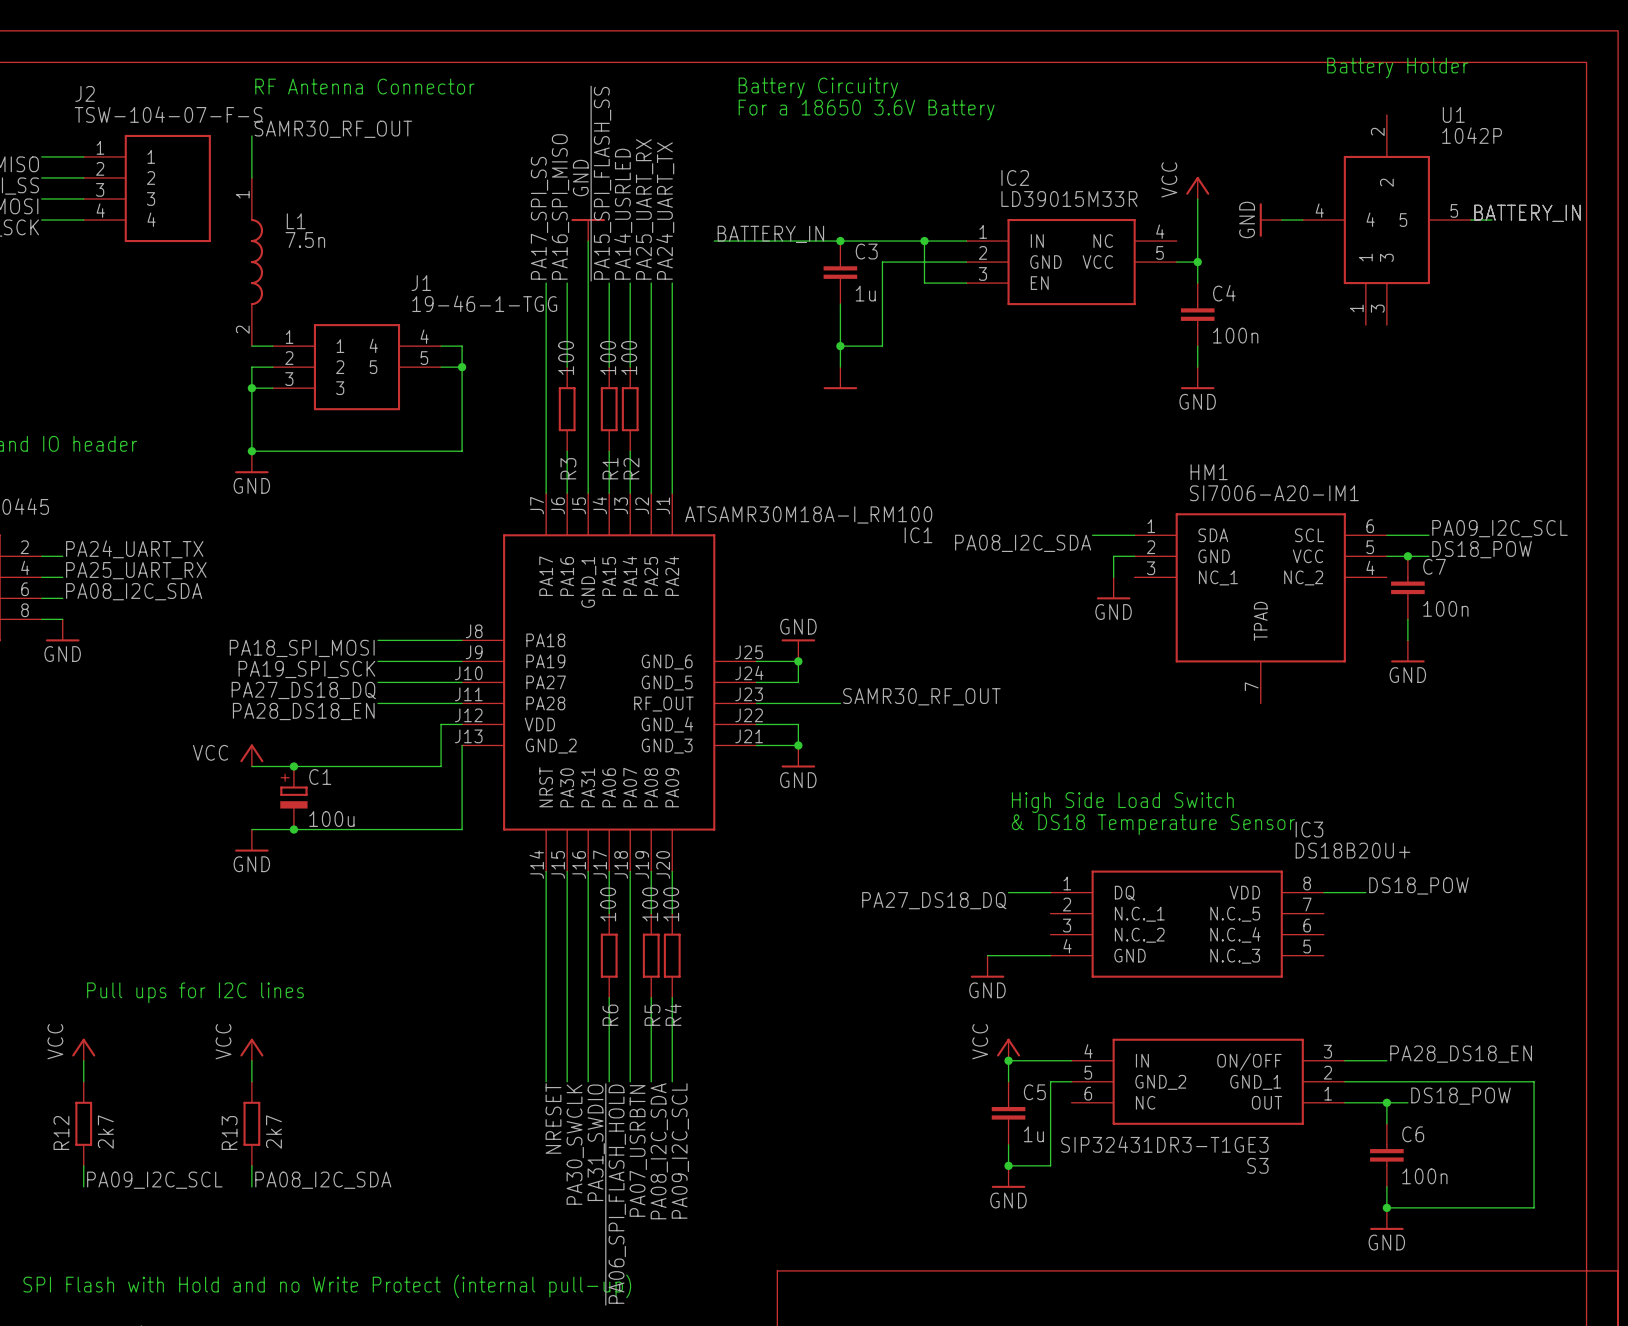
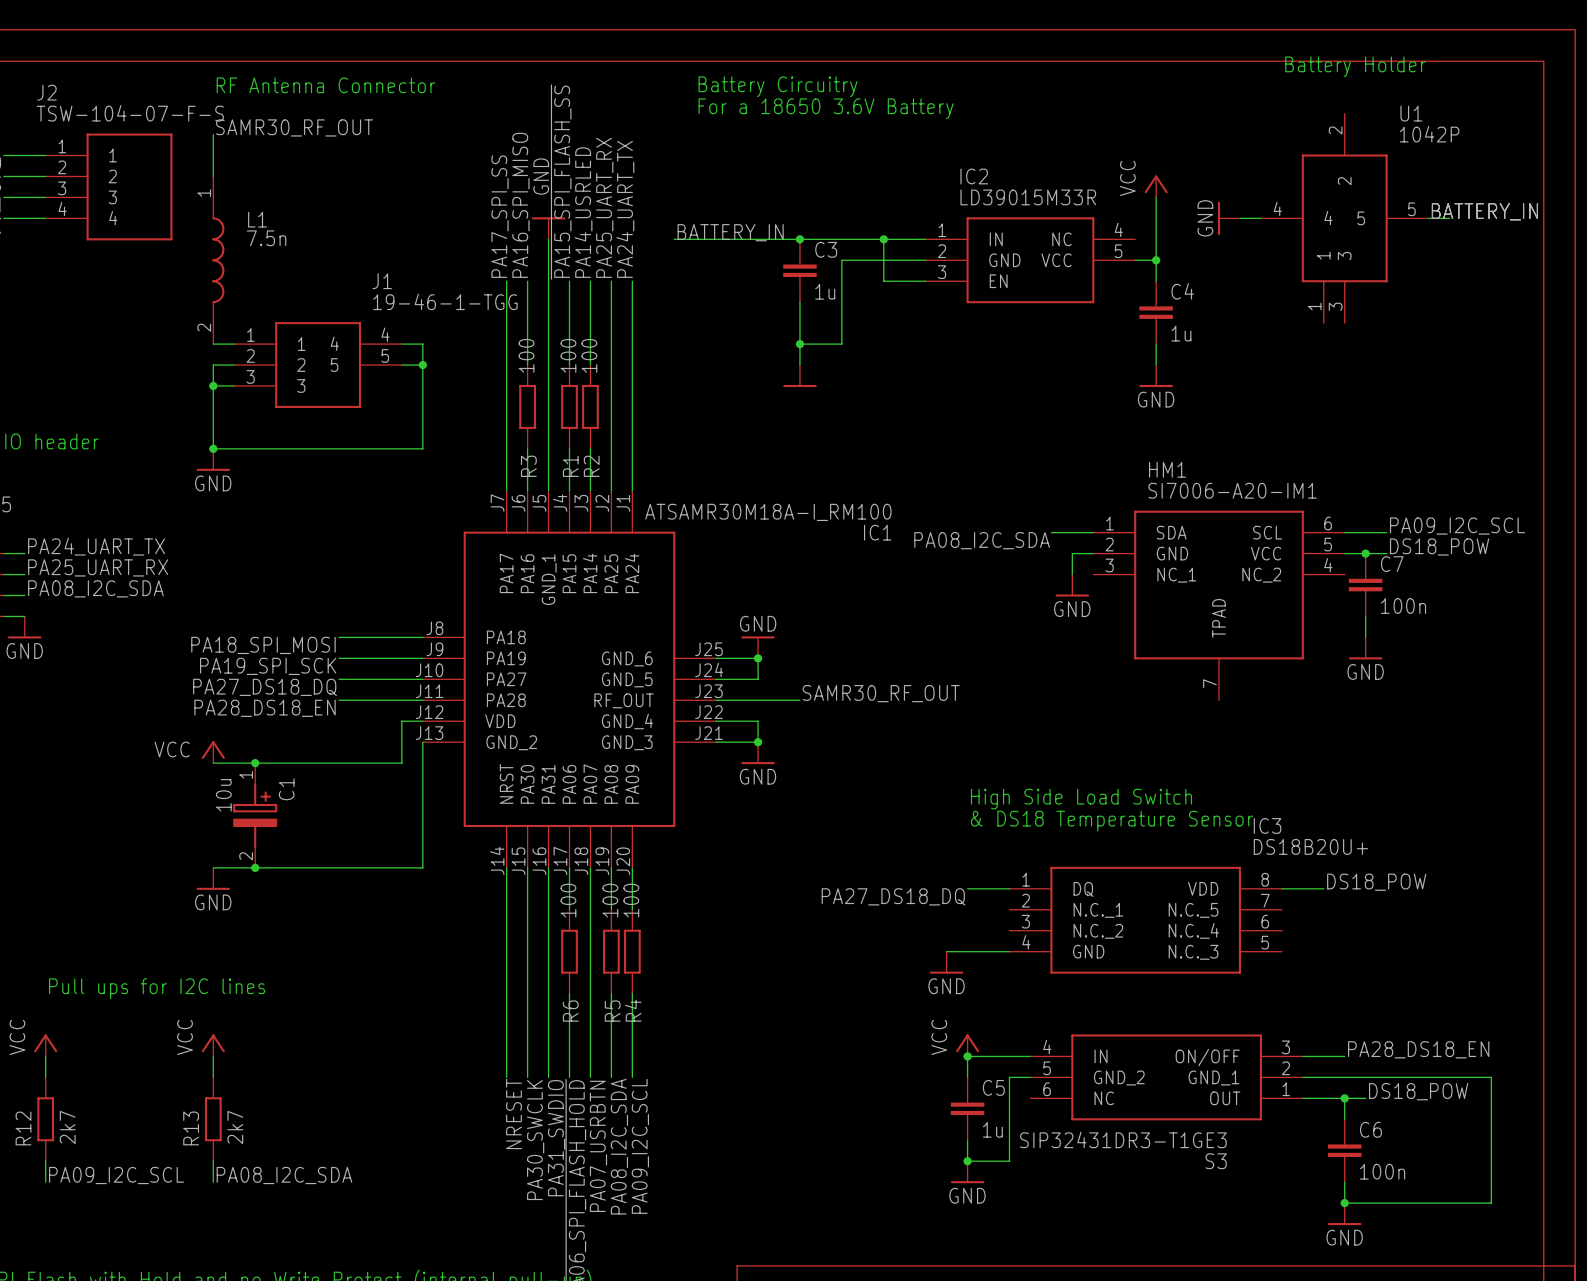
C4 value: 100n (1235, 335) -> 1u (1181, 333)
C1 symbol: [280, 766, 308, 830] -> [233, 763, 278, 868]
C1 value: 100u (331, 819) -> 10u (223, 795)
wire: (251, 829) (462, 829) -> (213, 867) (422, 867) (422, 825)
junction position: (293, 829) -> (255, 867)
power symbol position: GND (251, 840) -> GND (213, 878)

